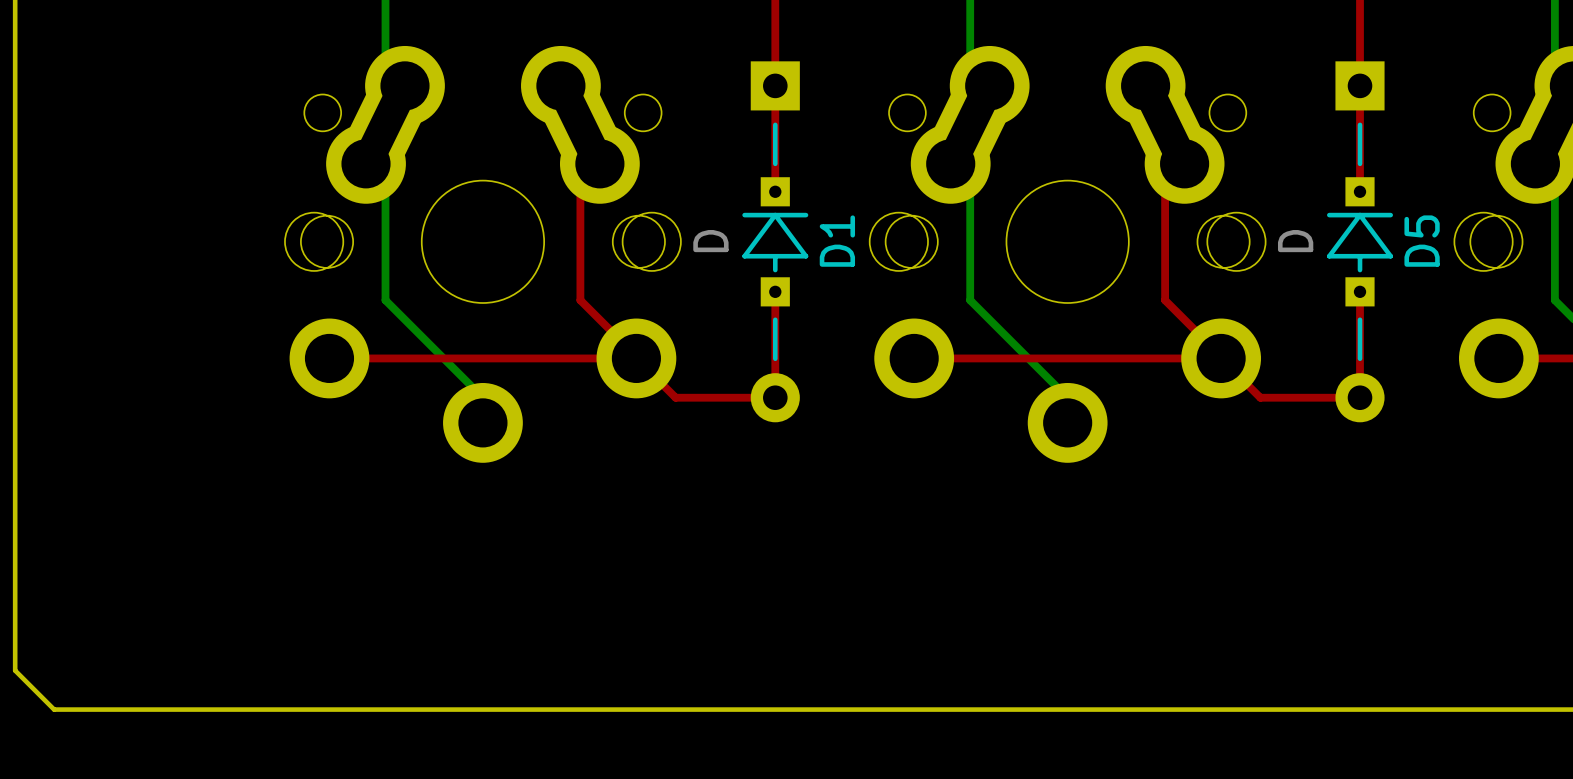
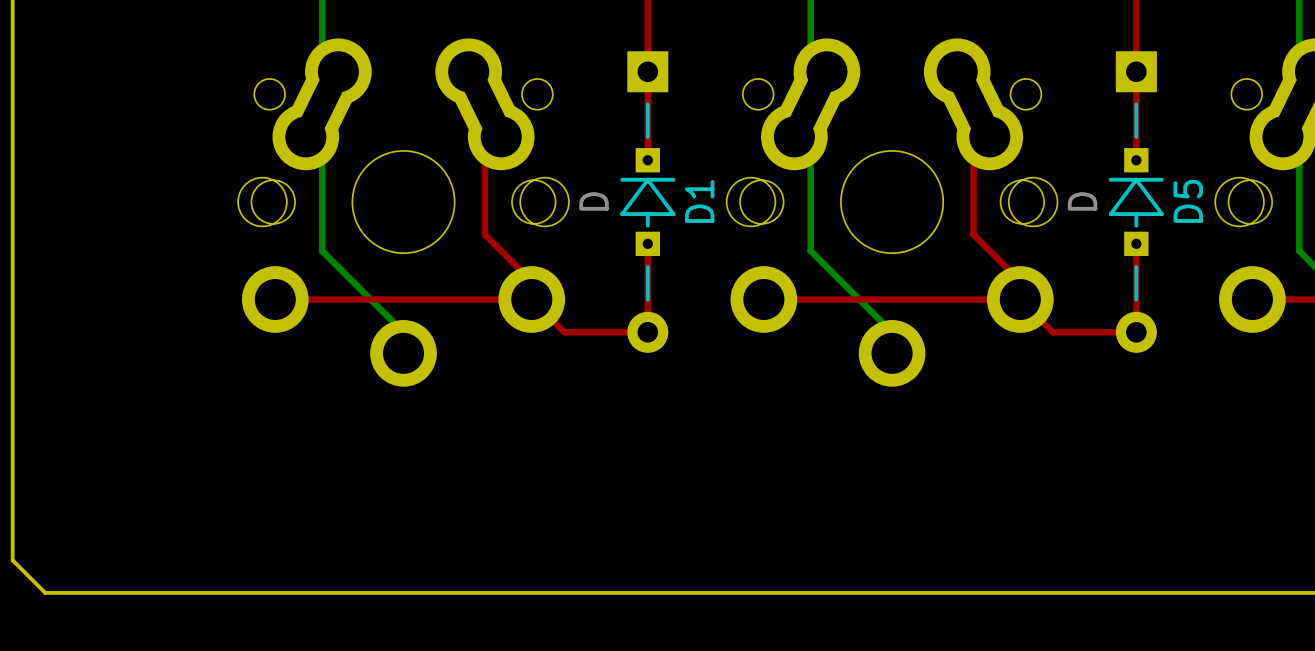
top track: (580, 280) (580, 300) (636, 356) -> (484, 234) (531, 281)
top track: (1165, 280) (1165, 300) (1221, 356) -> (973, 234) (1020, 281)

